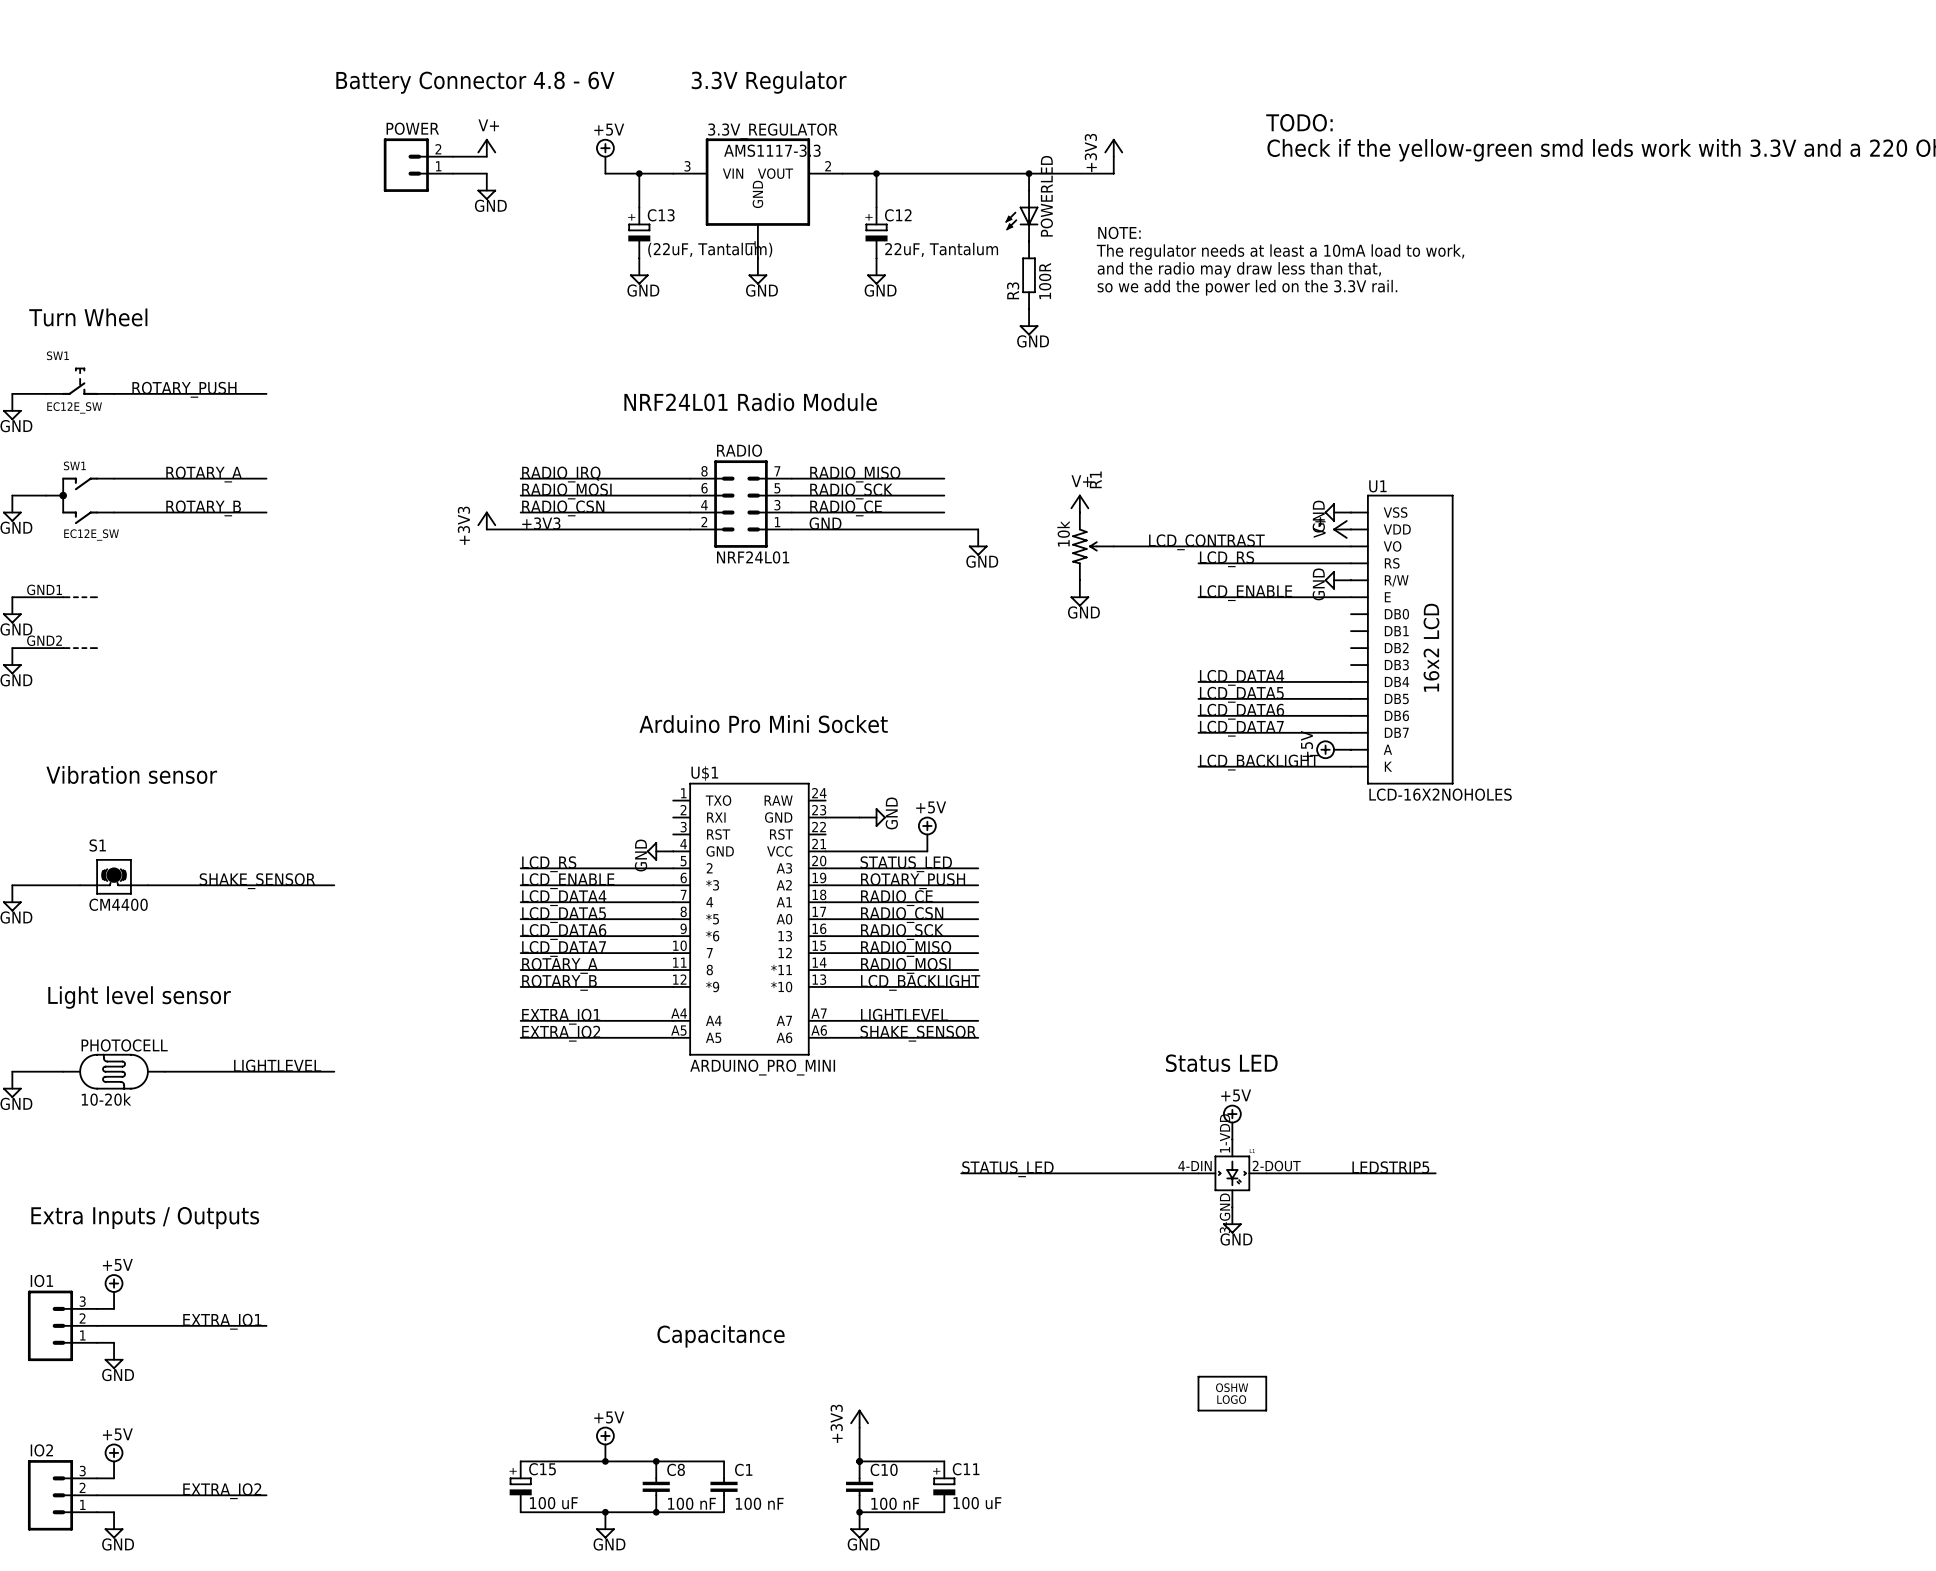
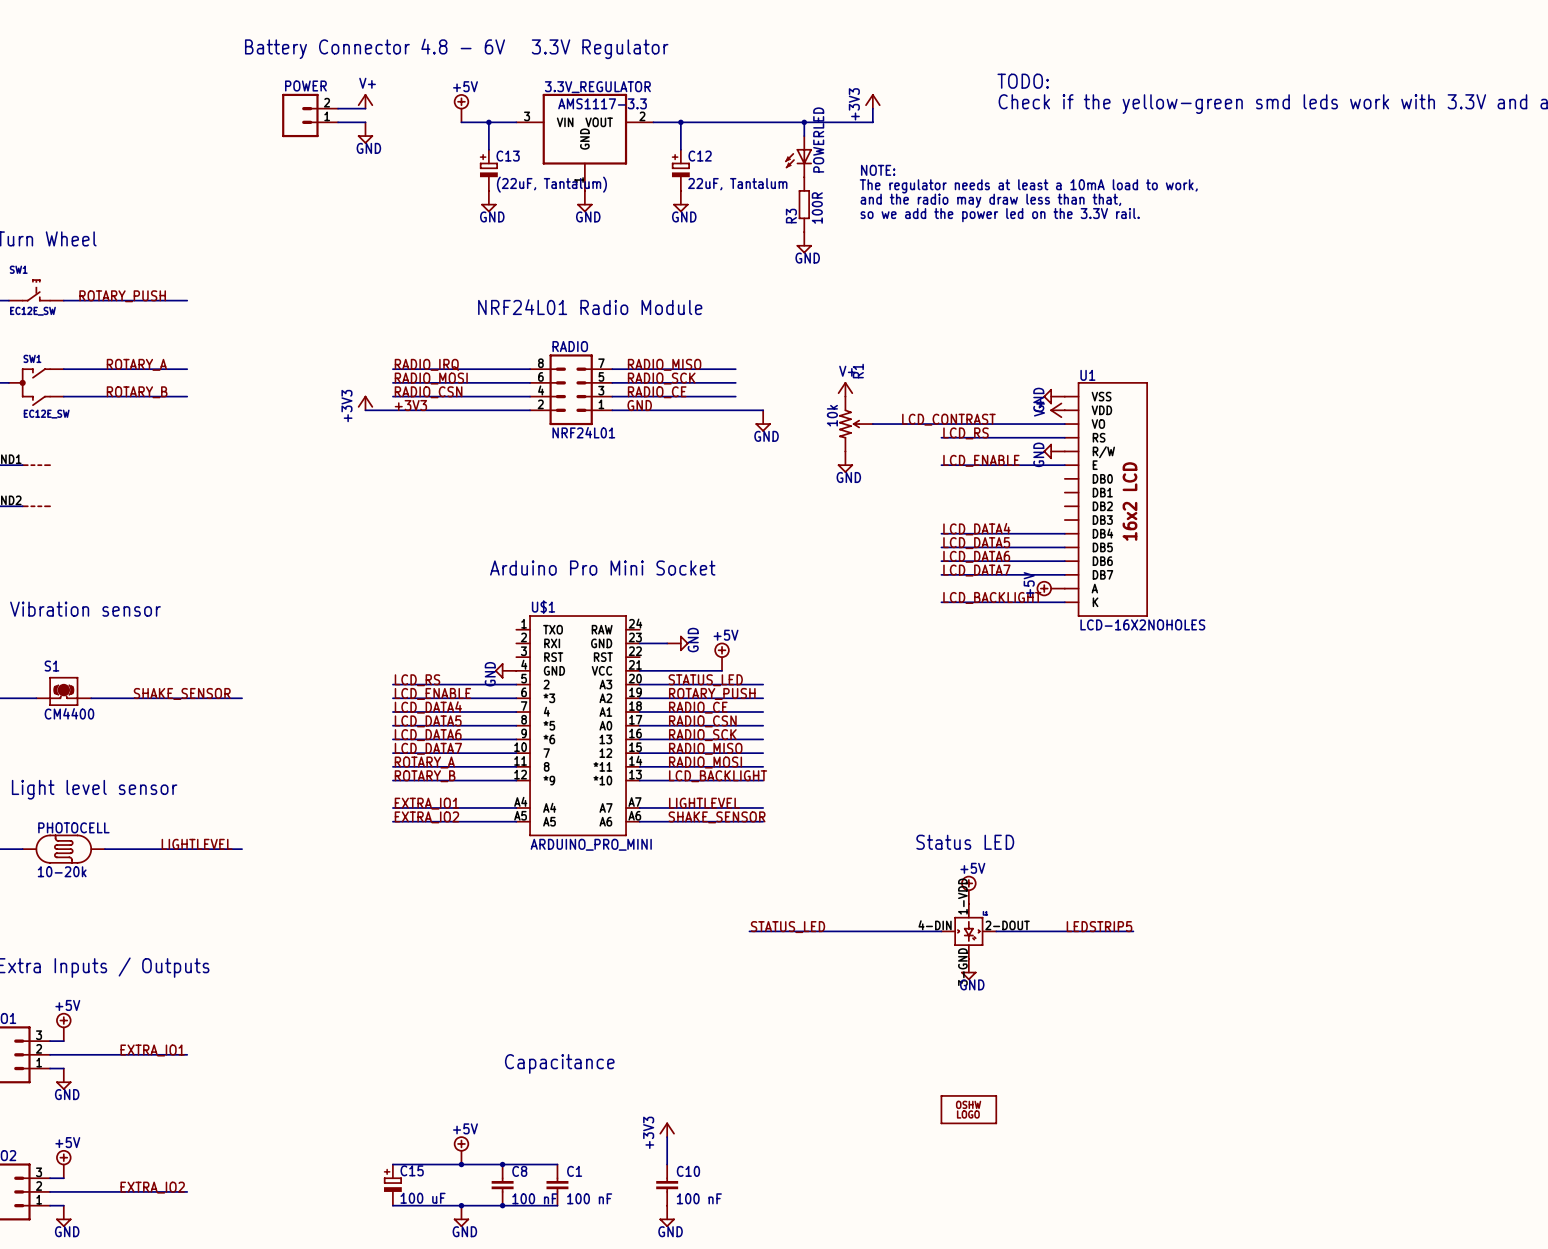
wire: (859, 1461) (944, 1461) -> none
junction: (859, 1461) -> none
C11: 100 uF (944, 1486) -> none
wire: (859, 1512) (944, 1512) -> none
junction: (859, 1512) -> none

